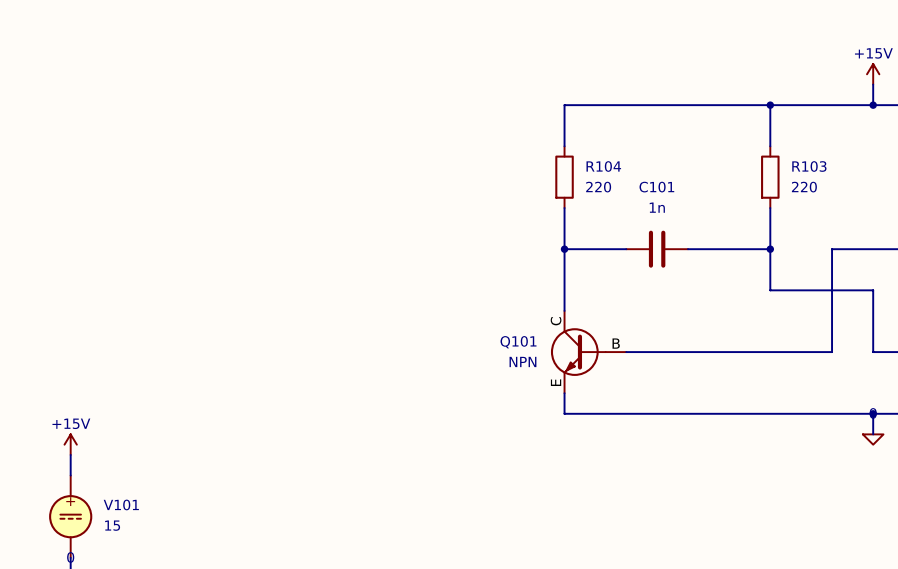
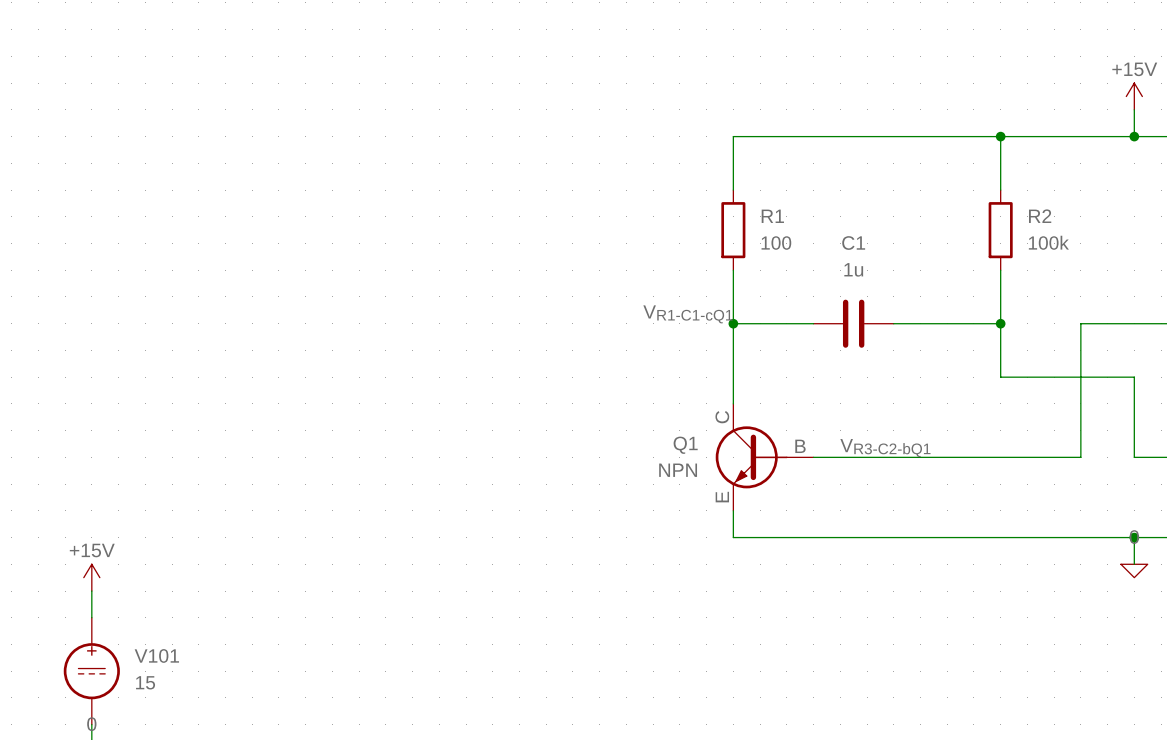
R104 name: R104 (603, 166) -> R1 (772, 216)
R103 name: R103 (809, 166) -> R2 (1040, 216)
R104 value: 220 (598, 187) -> 100 (776, 243)
C101 name: C101 (656, 187) -> C1 (853, 243)
R103 value: 220 (804, 187) -> 100k (1048, 242)
C101 value: 1n (657, 207) -> 1u (853, 269)
label: none -> VR1-C1-cQ1 (687, 314)
Q101 name: Q101 (518, 342) -> Q1 (685, 445)
label: none -> VR3-C2-bQ1 (885, 448)

